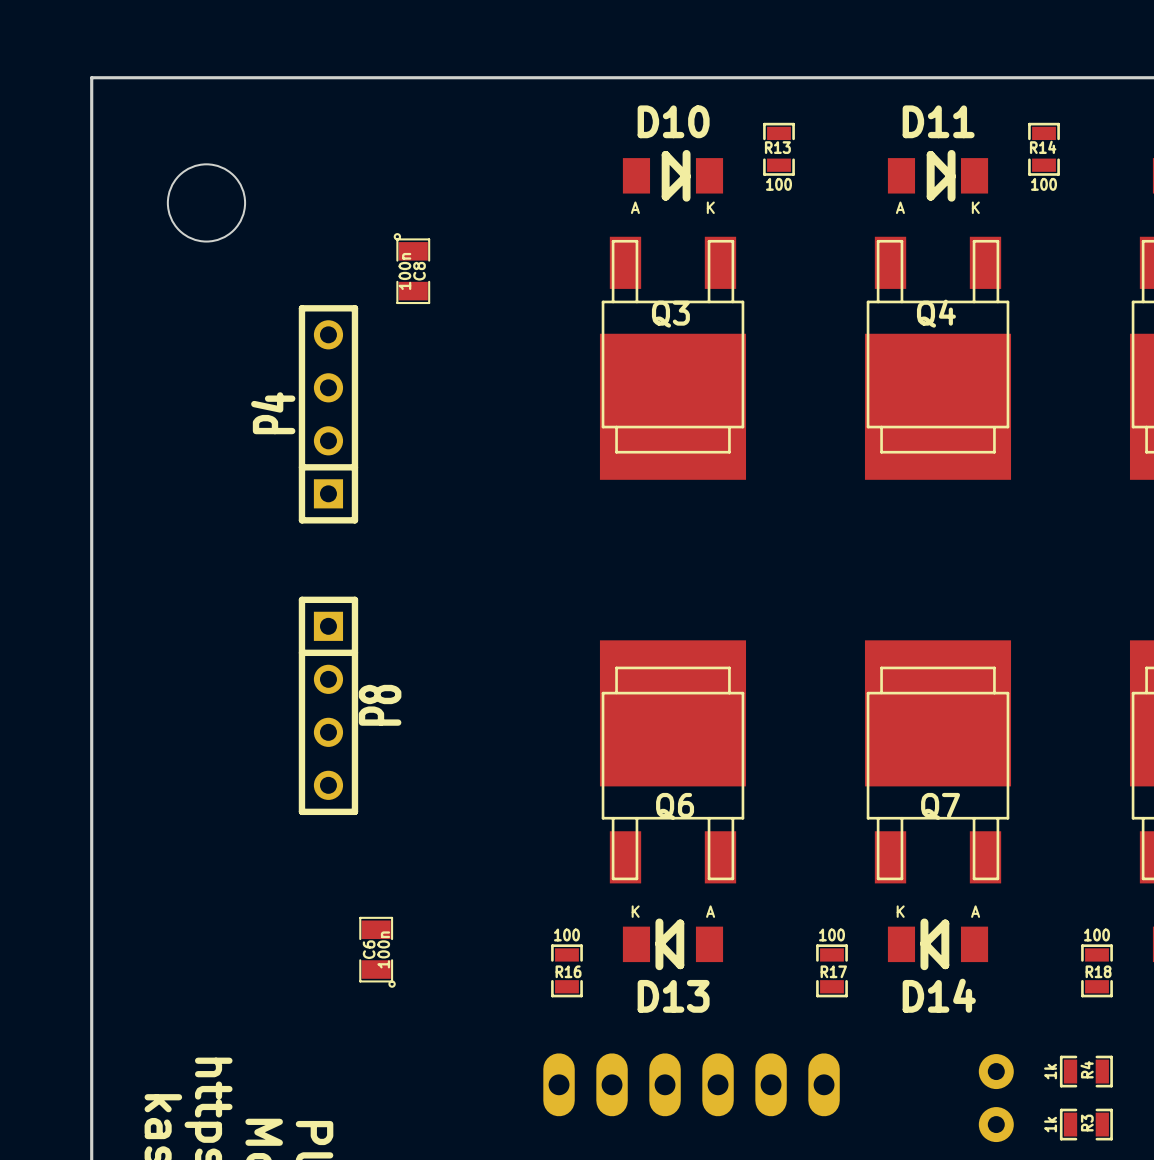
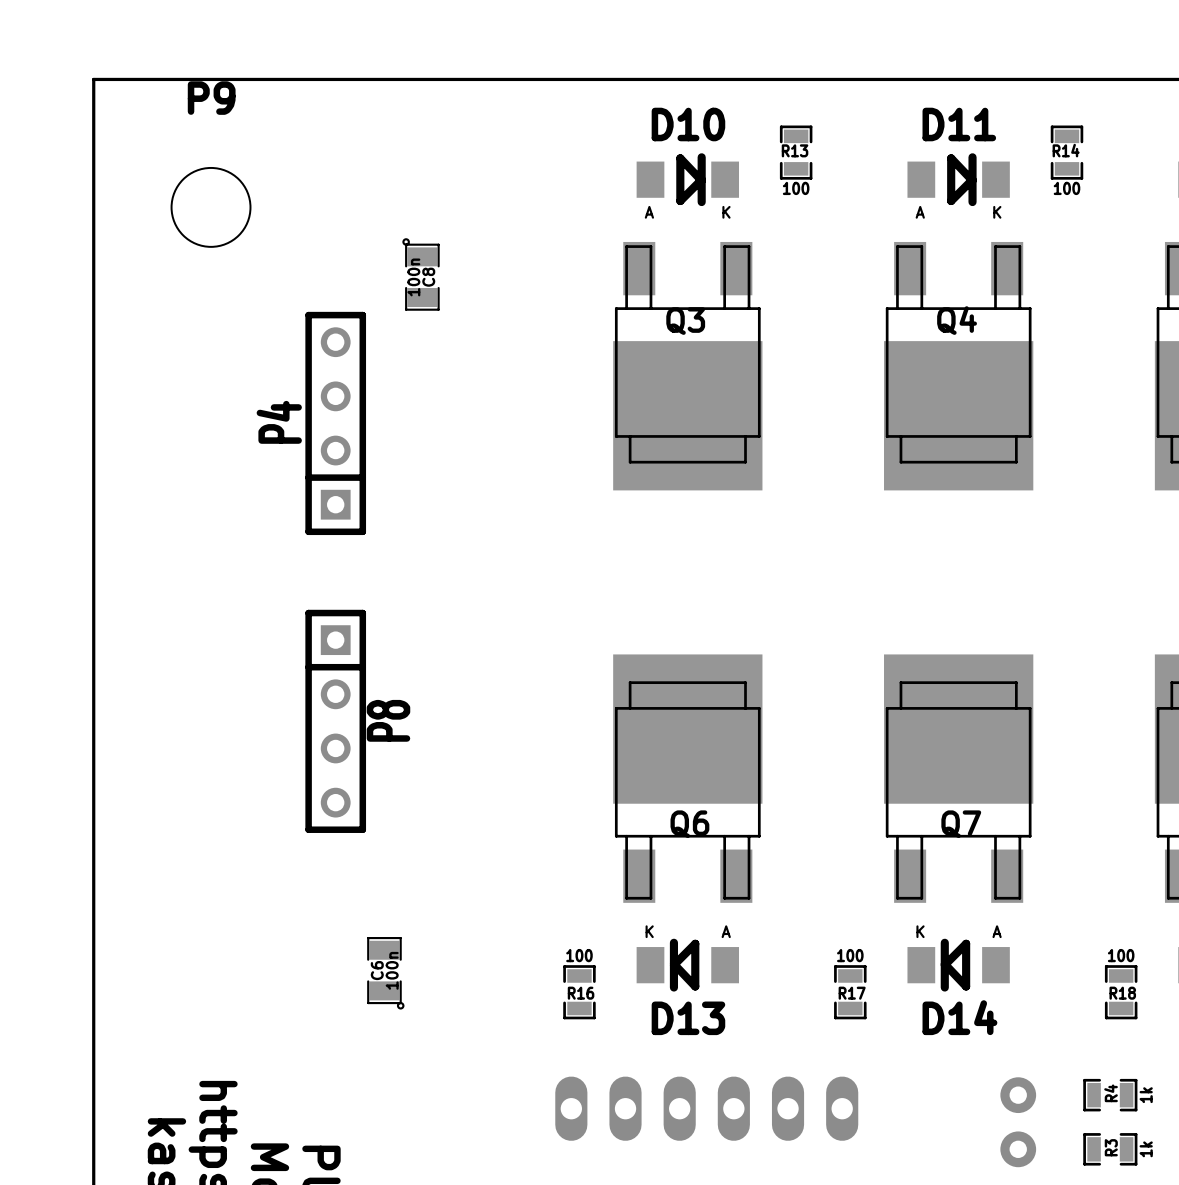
P9 name: none -> P9 (211, 98)
R4 value position: 1k (1050, 1071) -> 1k (1146, 1095)
R3 value position: 1k (1050, 1124) -> 1k (1146, 1149)

